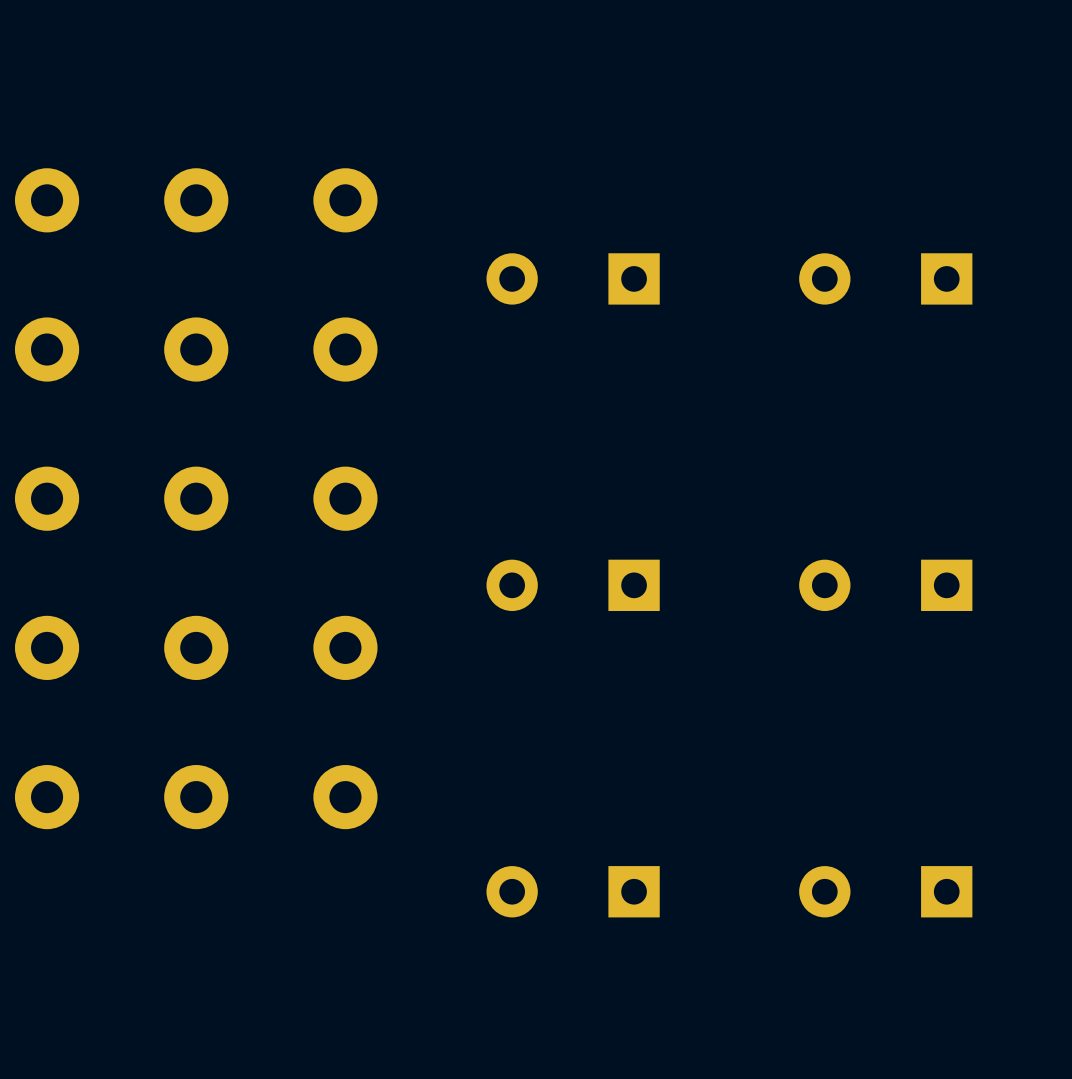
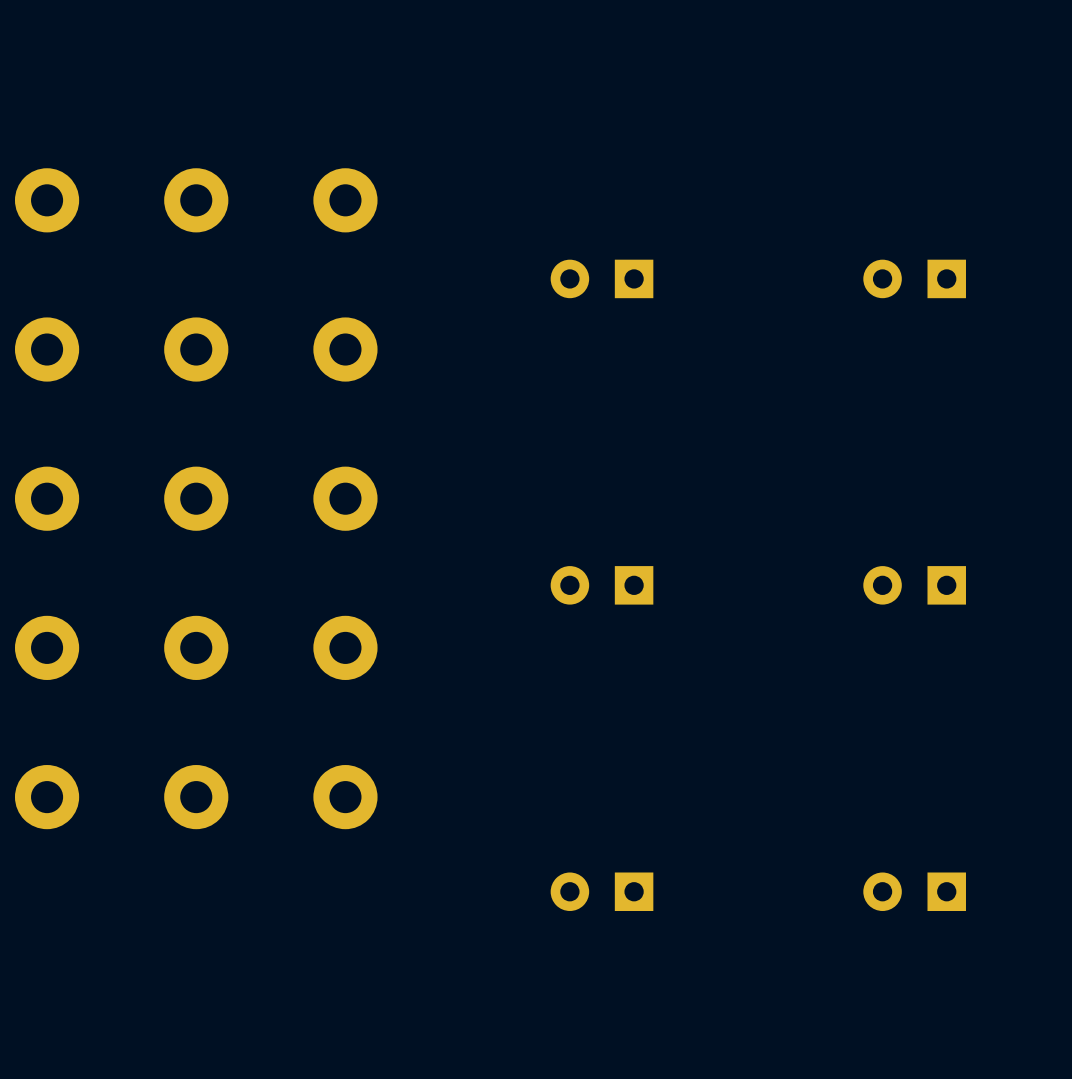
part footprint: [486, 253, 660, 305] -> [550, 259, 654, 299]
part footprint: [799, 253, 973, 305] -> [863, 259, 966, 299]
part footprint: [486, 559, 660, 612] -> [550, 566, 654, 605]
part footprint: [799, 559, 973, 612] -> [863, 566, 966, 605]
part footprint: [486, 866, 660, 918] -> [550, 872, 654, 912]
part footprint: [799, 866, 973, 918] -> [863, 872, 966, 912]

